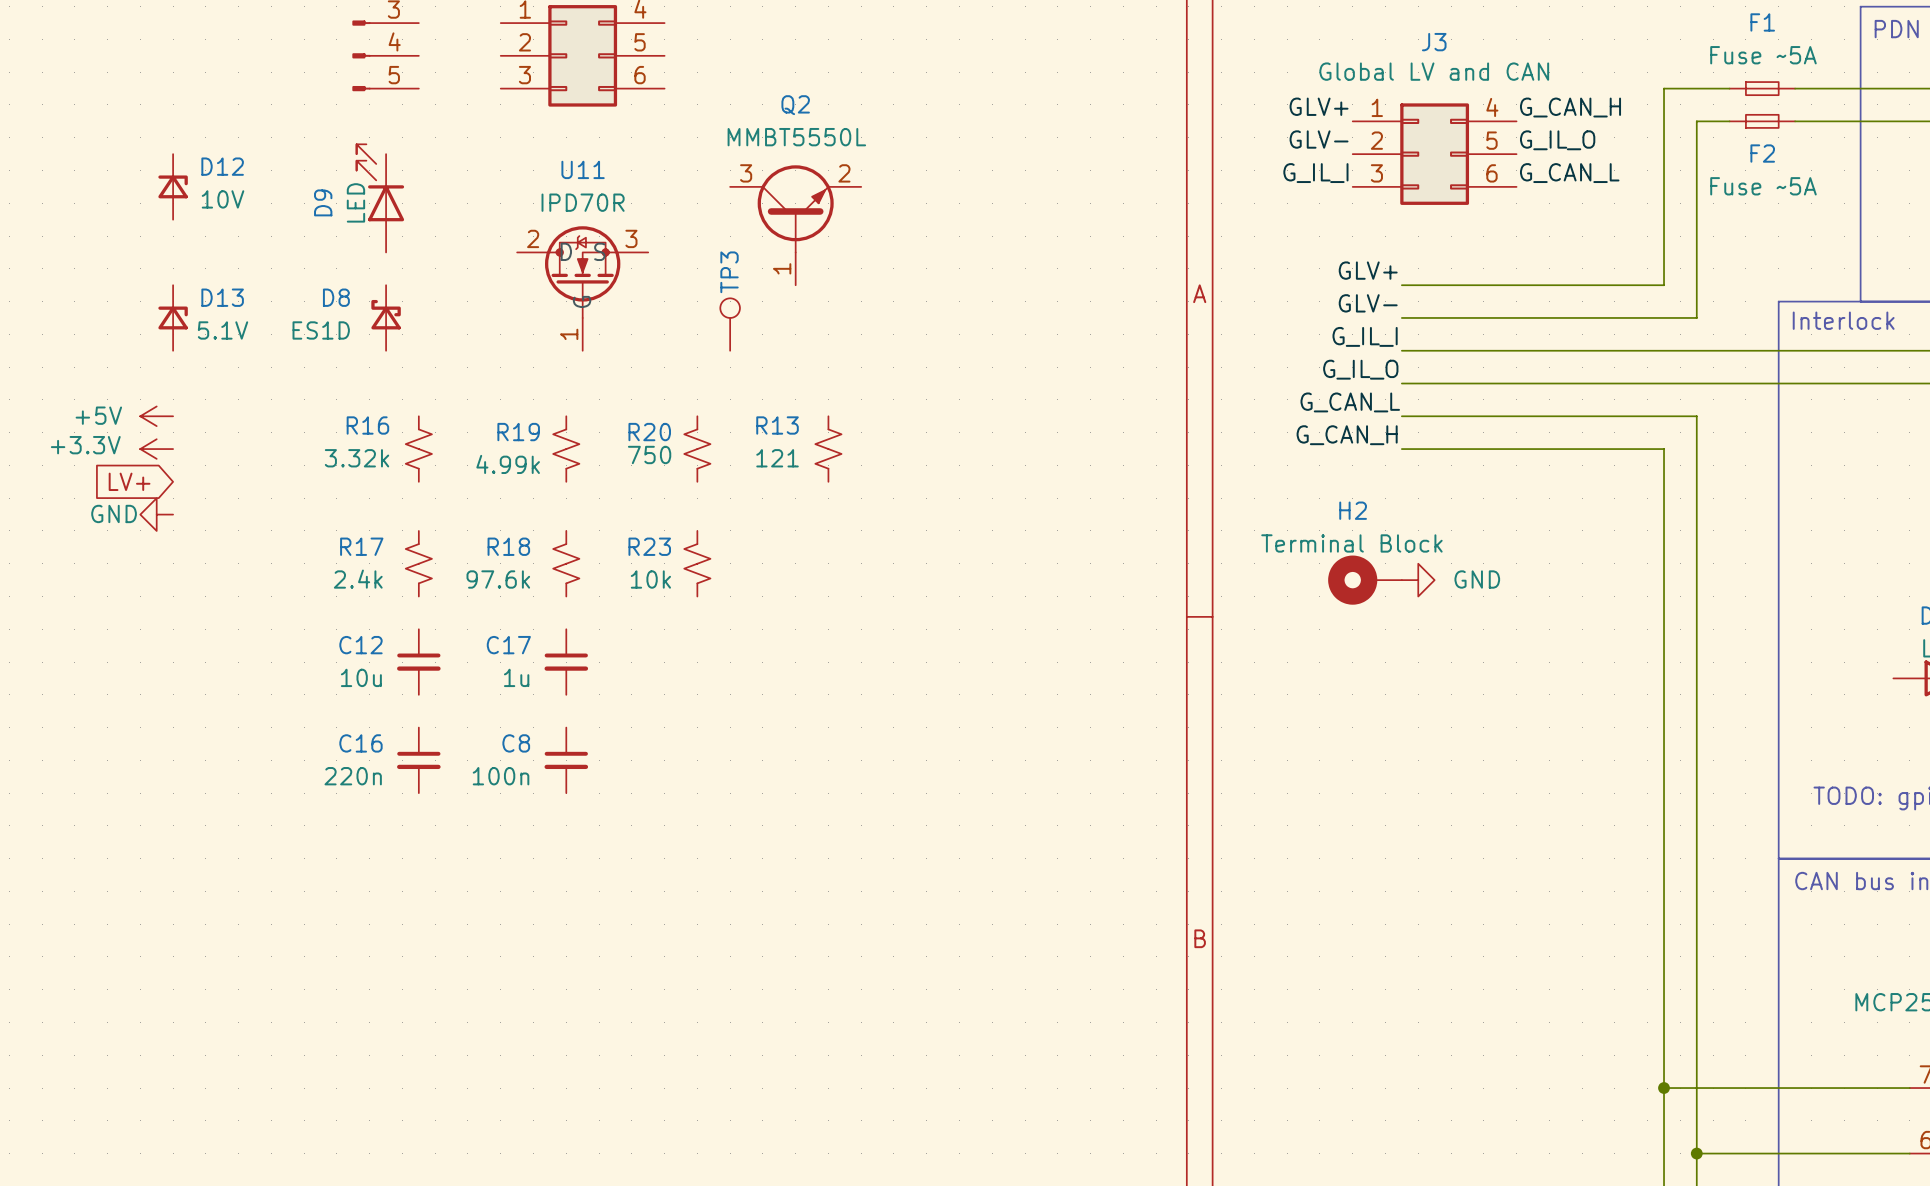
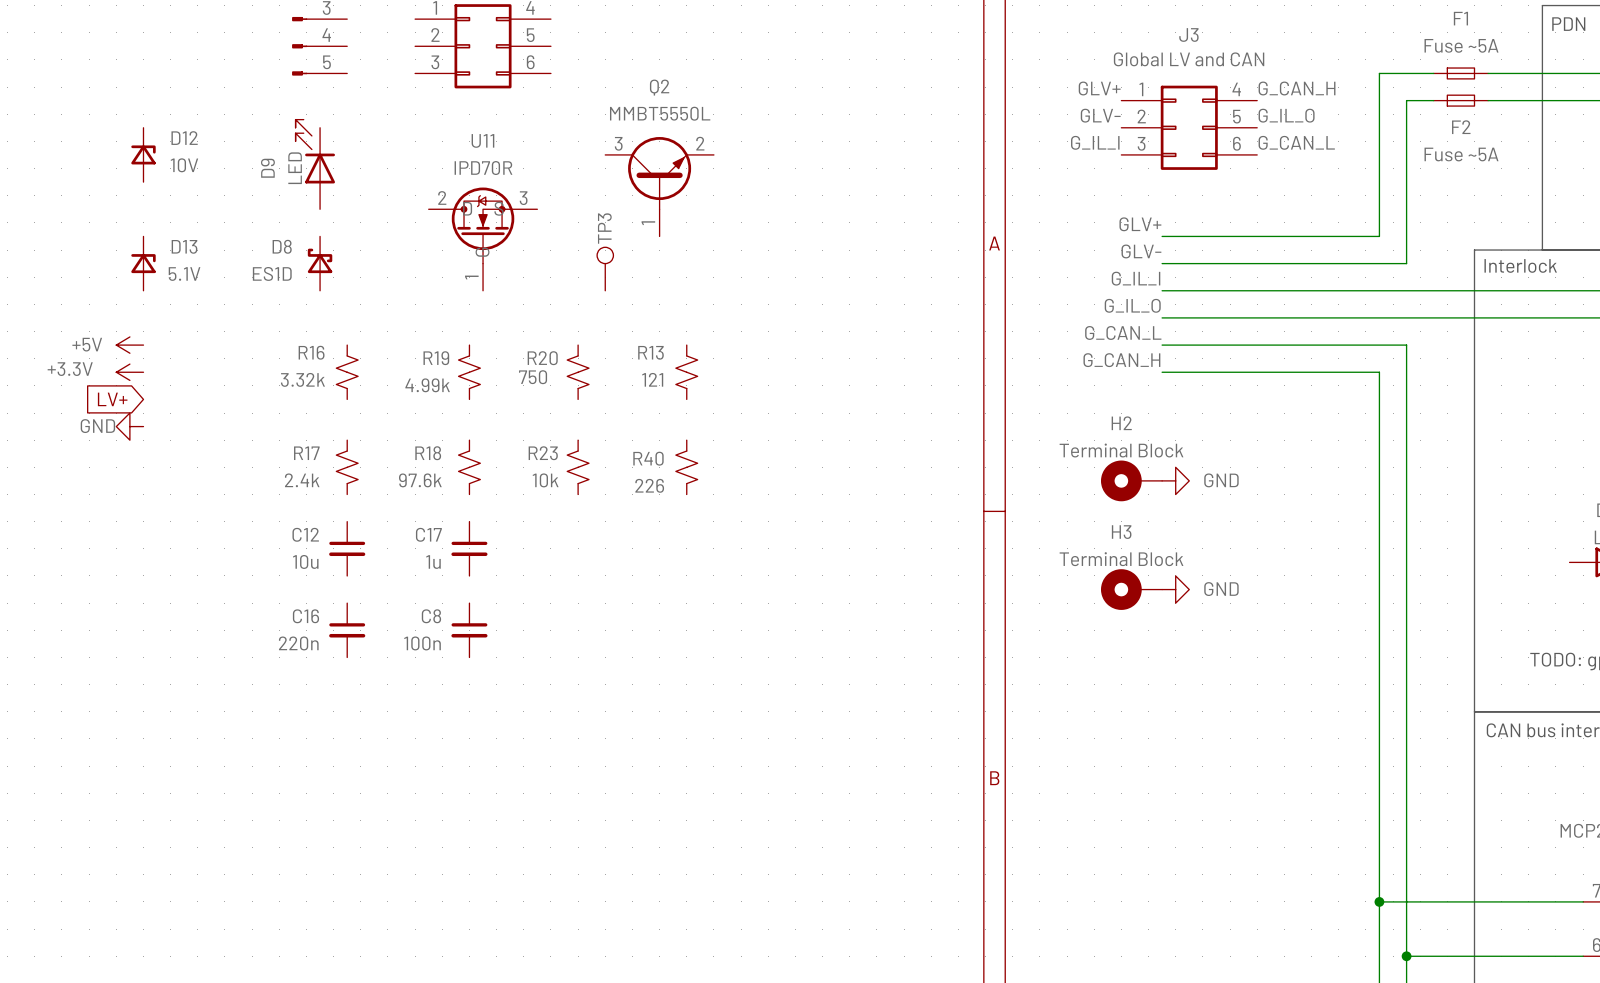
R40: none -> 226 (686, 467)
H3: none -> Terminal Block (1131, 589)
power symbol: none -> GND (1175, 589)

